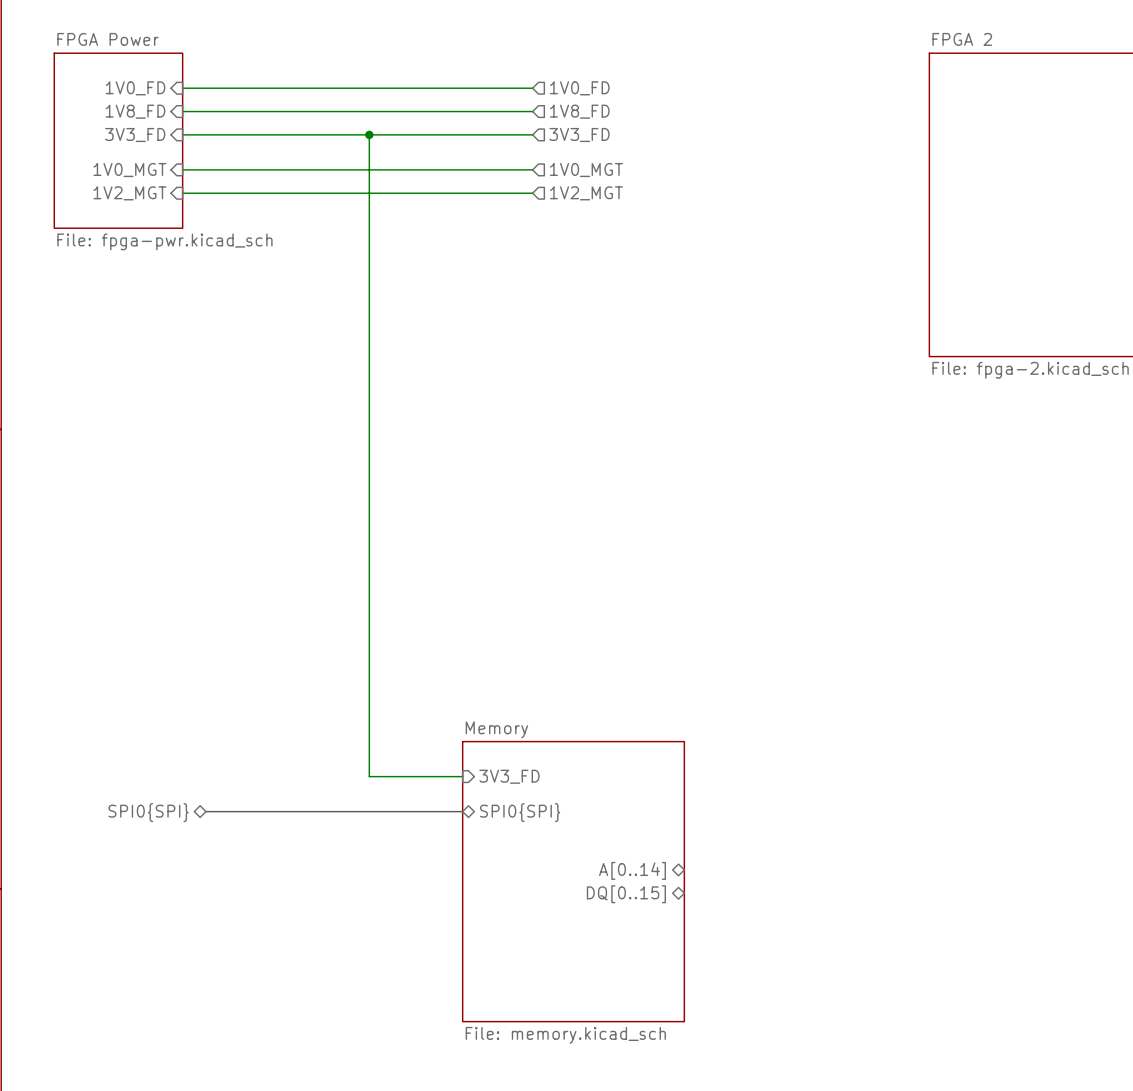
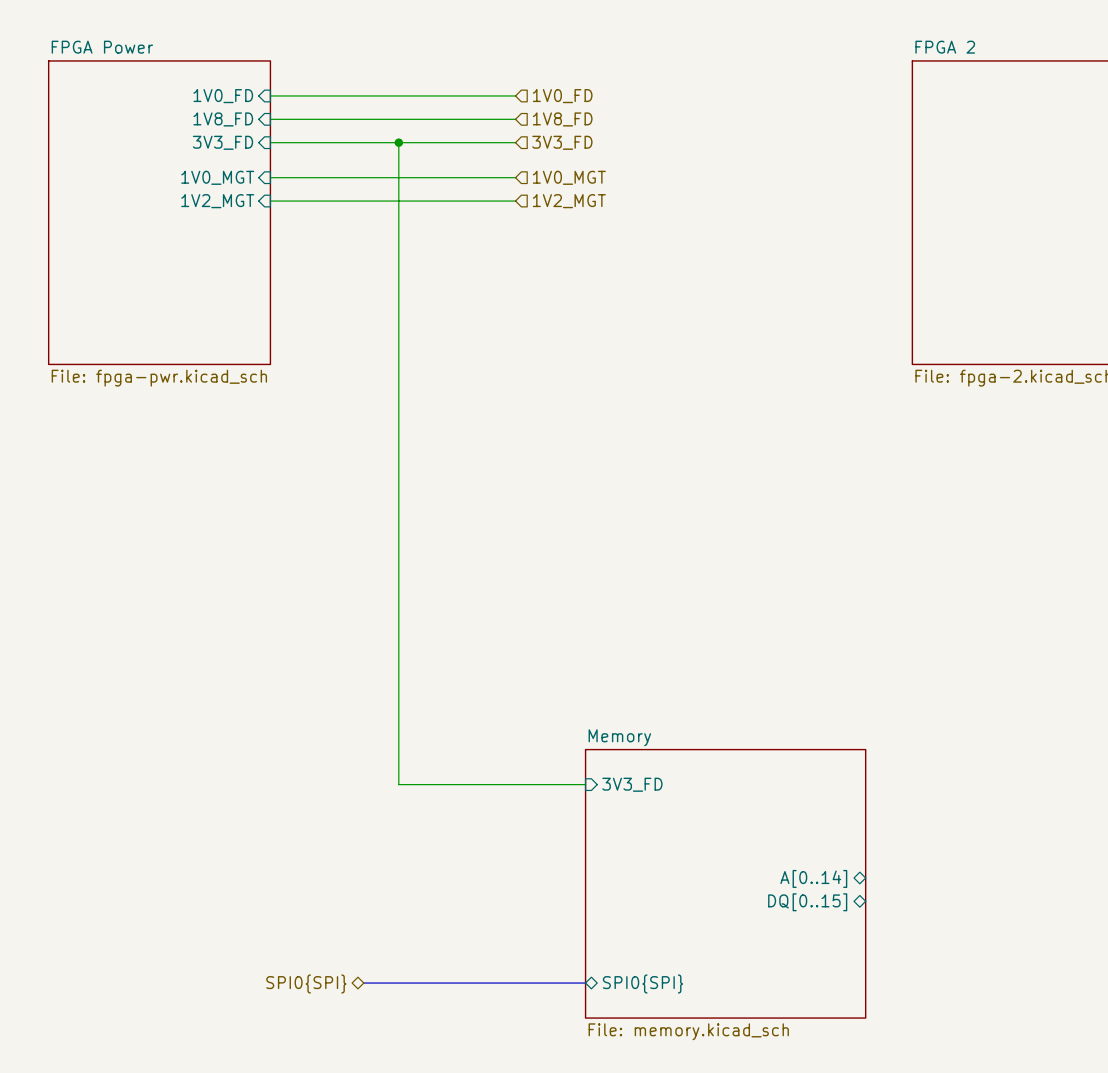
sheet pin position: 1V0_FD (135, 88) -> 1V0_FD (223, 96)
wire: (182, 88) (287, 88) -> none
sheet pin position: 1V8_FD (135, 111) -> 1V8_FD (223, 119)
wire: (182, 111) (287, 111) -> none
wire: (182, 134) (287, 134) -> none
wire: (369, 134) (369, 776) (415, 776) -> (398, 142) (398, 784)
junction position: (369, 134) -> (398, 142)
sheet pin position: 3V3_FD (135, 135) -> 3V3_FD (223, 142)
sheet FPGA Power: File: fpga-pwr.kicad_sch (118, 140) -> none
wire: (182, 169) (287, 169) -> none
sheet pin position: 1V0_MGT (129, 170) -> 1V0_MGT (217, 177)
sheet pin position: 1V2_MGT (129, 193) -> 1V2_MGT (217, 201)
wire: (182, 193) (287, 193) -> none
sheet FPGA Power: none -> File: fpga-pwr.kicad_sch (159, 212)
wire: none -> (445, 784) (585, 784)
sheet pin position: 3V3_FD (509, 776) -> 3V3_FD (632, 784)
bus: (205, 811) (462, 811) -> none
hierarchical label: SPI0{SPI} (148, 812) -> none
sheet pin position: SPI0{SPI} (520, 812) -> SPI0{SPI} (642, 983)
sheet pin position: A[0..14] (632, 870) -> A[0..14] (813, 878)
sheet Memory: none -> File: memory.kicad_sch (725, 883)
sheet Memory: File: memory.kicad_sch (573, 881) -> none
sheet pin position: DQ[0..15] (626, 894) -> DQ[0..15] (807, 902)
bus: none -> (363, 983) (585, 983)
hierarchical label: none -> SPI0{SPI} (306, 983)

